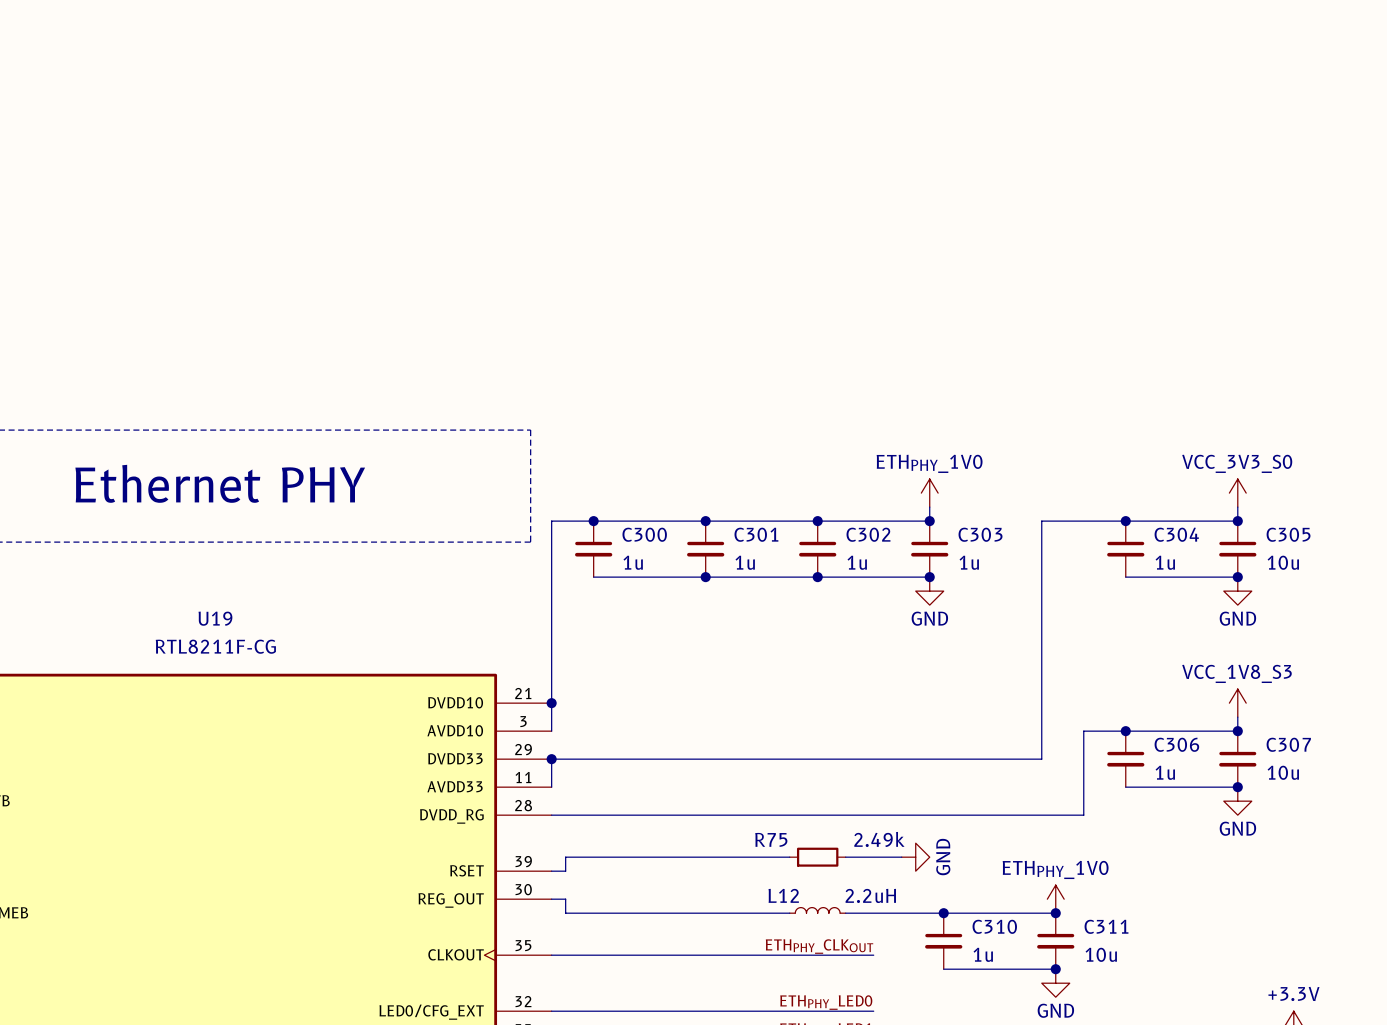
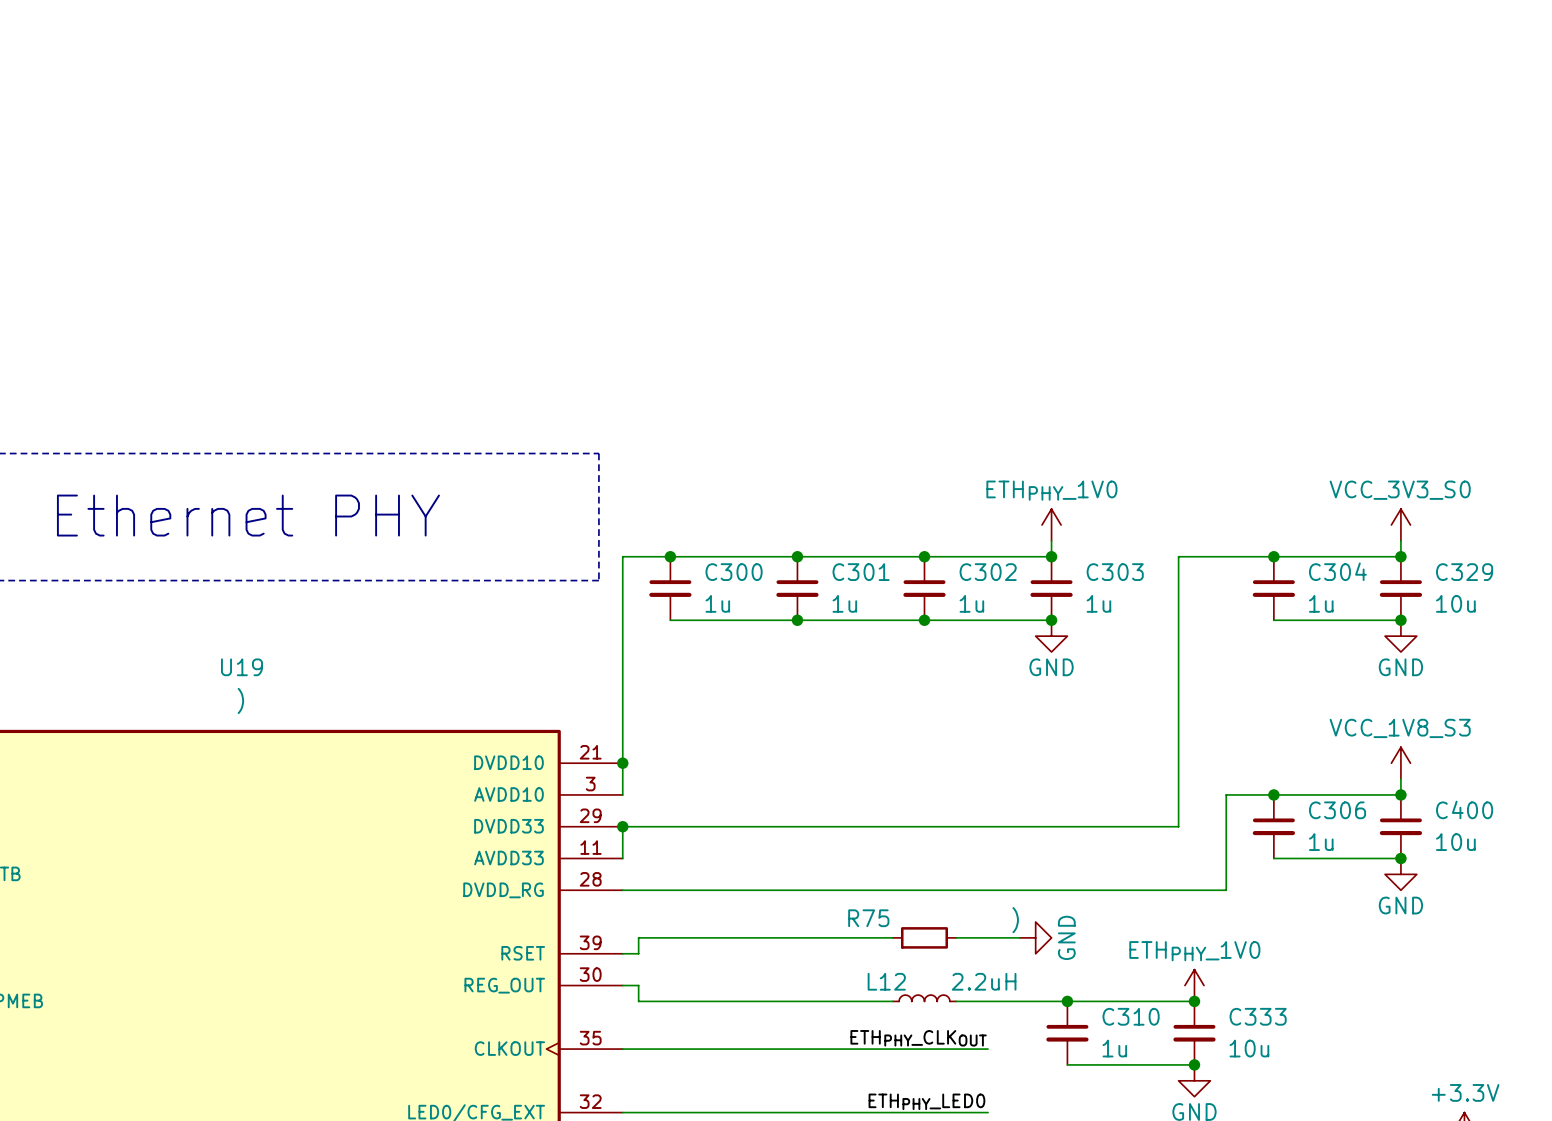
C305 name: C305 (1288, 534) -> C329 (1464, 572)
U19 value: RTL8211F-CG (215, 646) -> ) (240, 700)
C307 name: C307 (1288, 744) -> C400 (1464, 809)
R75 value: 2.49k (879, 839) -> ) (1015, 920)
C311 name: C311 (1106, 926) -> C333 (1258, 1016)

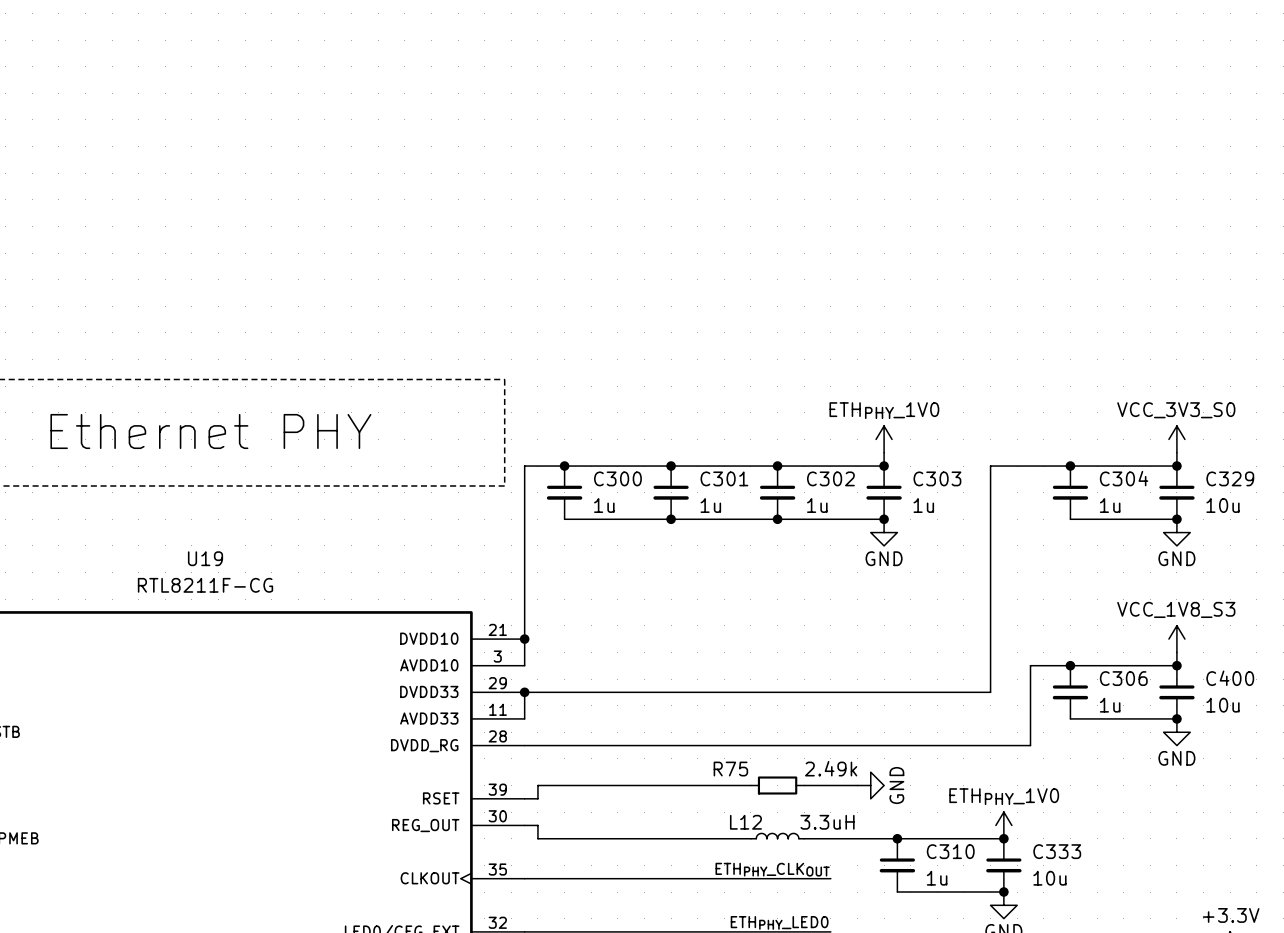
U19 value: ) (240, 700) -> RTL8211F-CG (205, 585)
R75 value: ) (1015, 920) -> 2.49k (831, 768)
L12 value: 2.2uH (984, 981) -> 3.3uH (827, 822)

